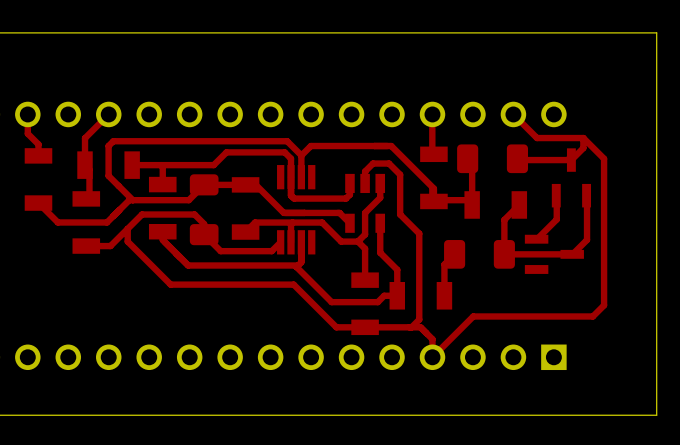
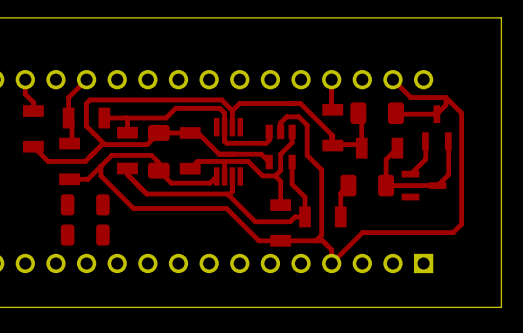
part: none -> (85, 204)
part: none -> (85, 235)

